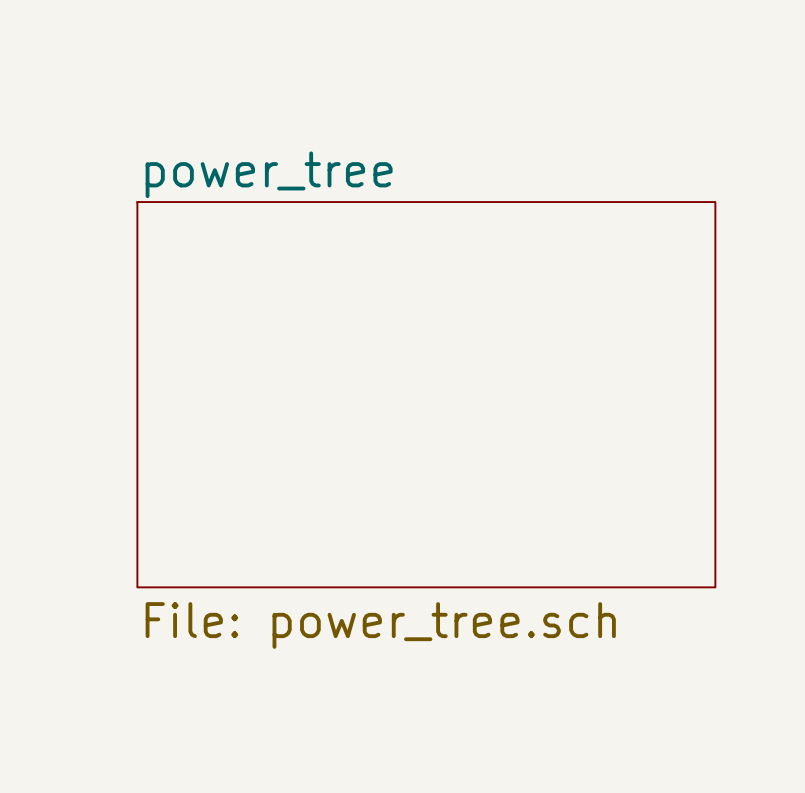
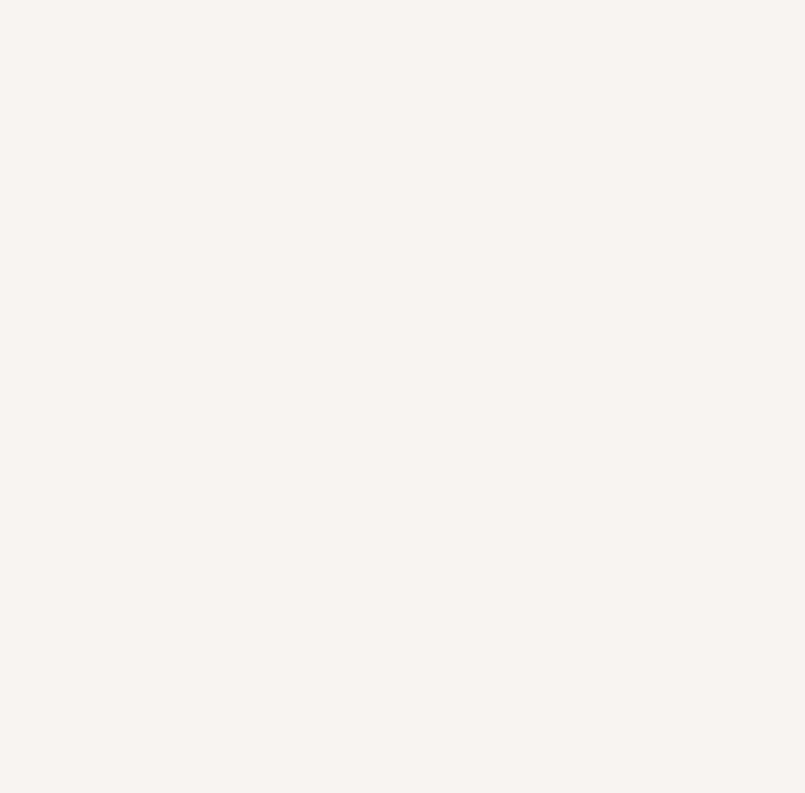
sheet power_tree: File: power_tree.sch (426, 394) -> none

